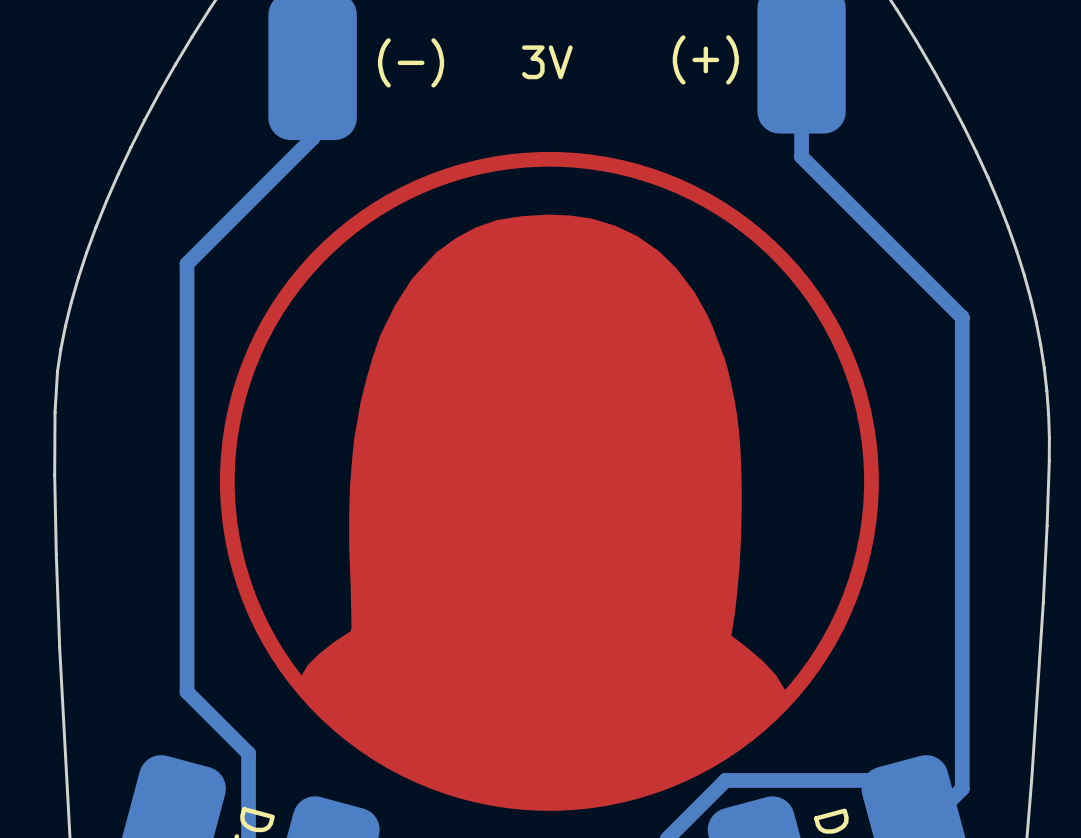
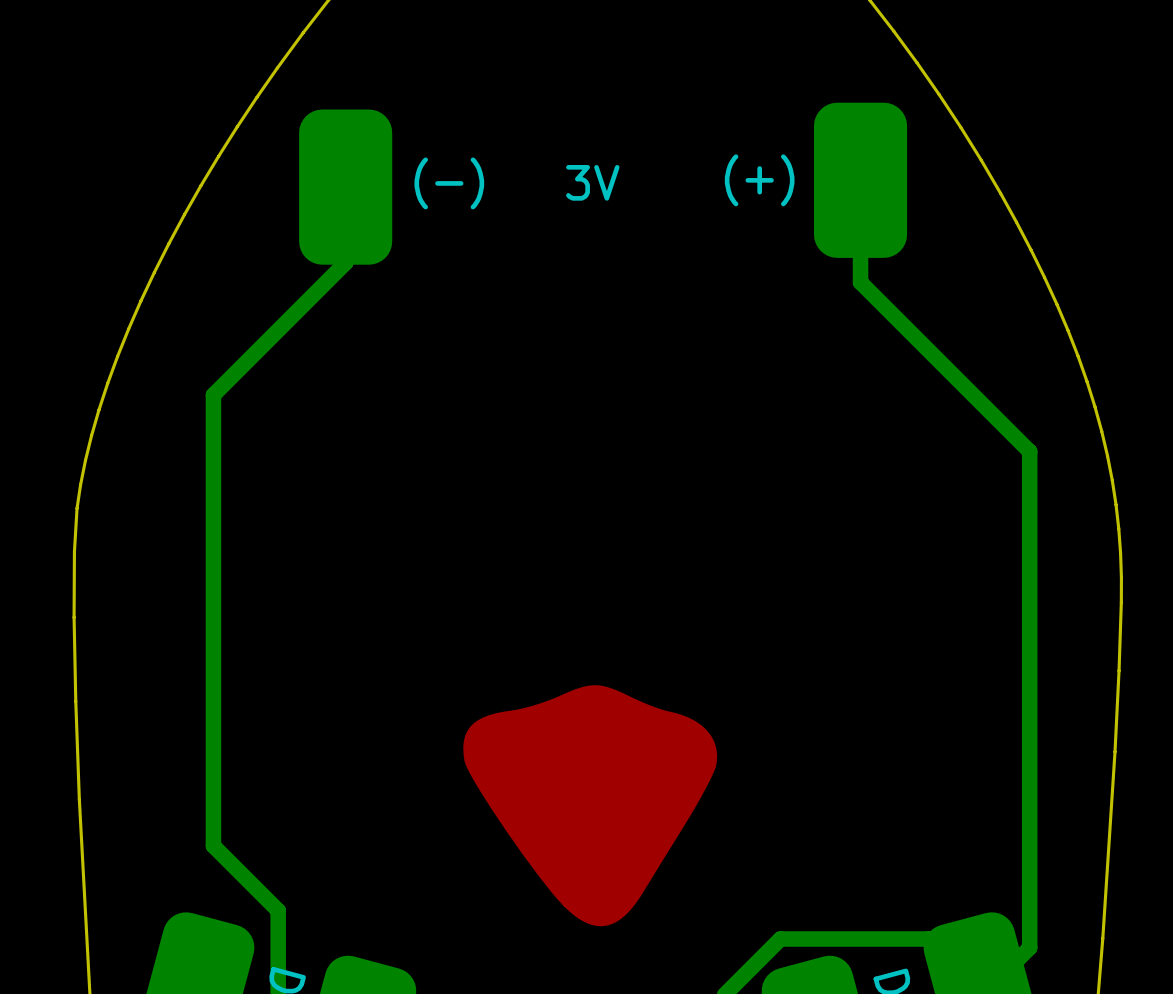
drawing: [219, 151, 879, 811] -> none

